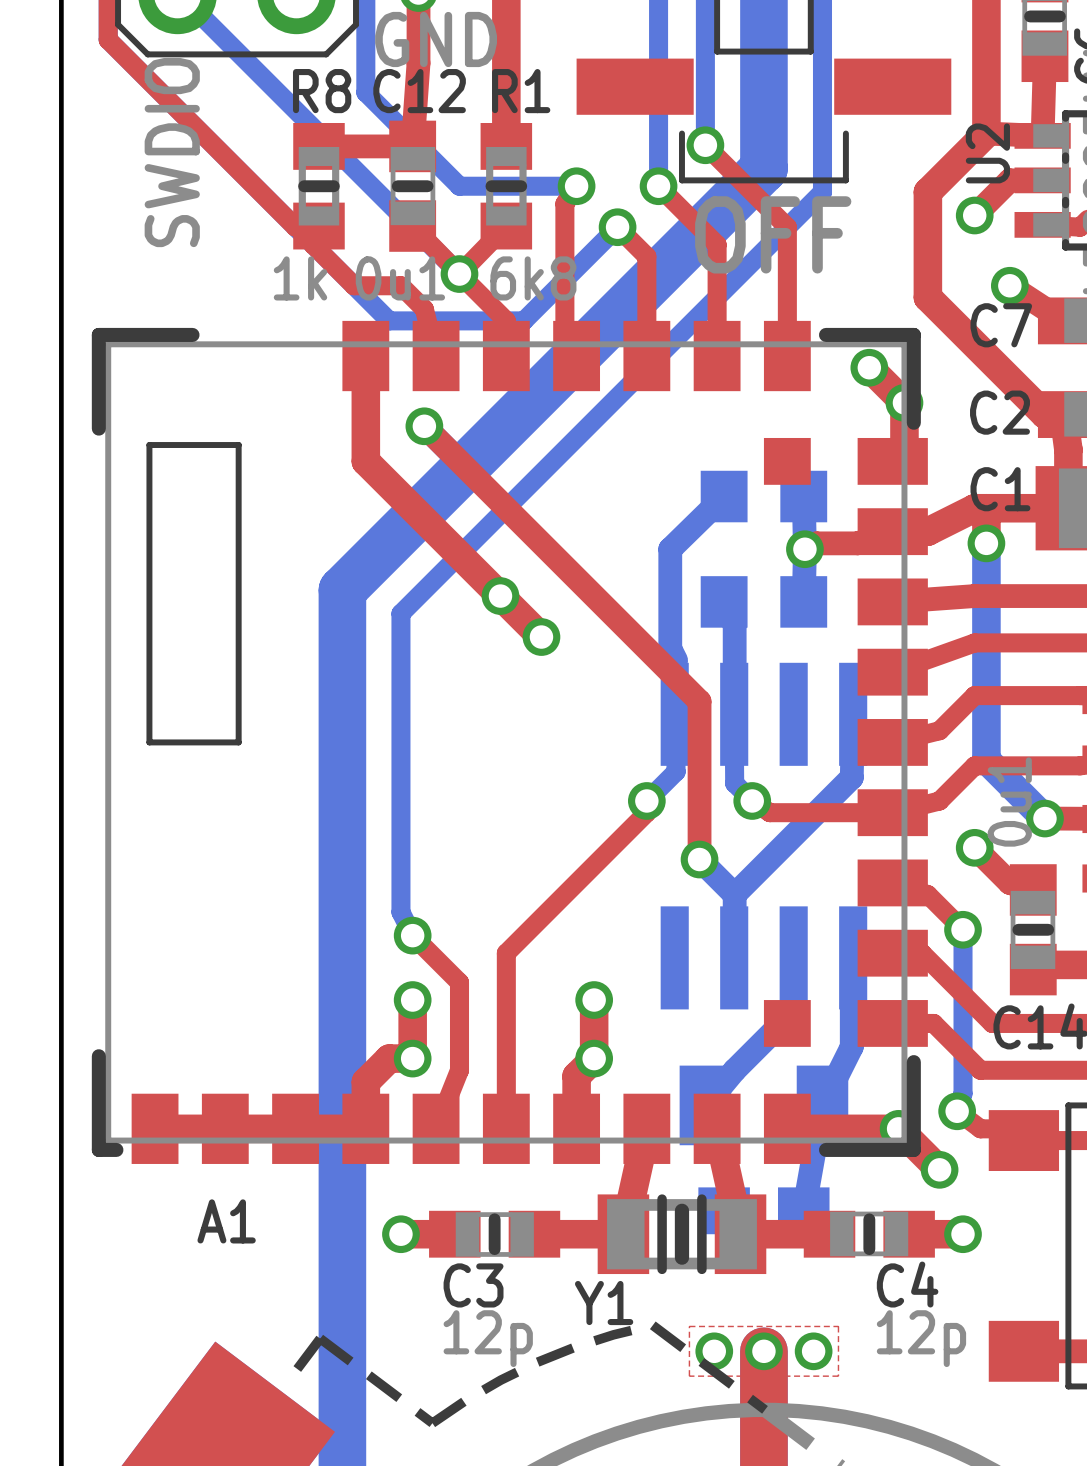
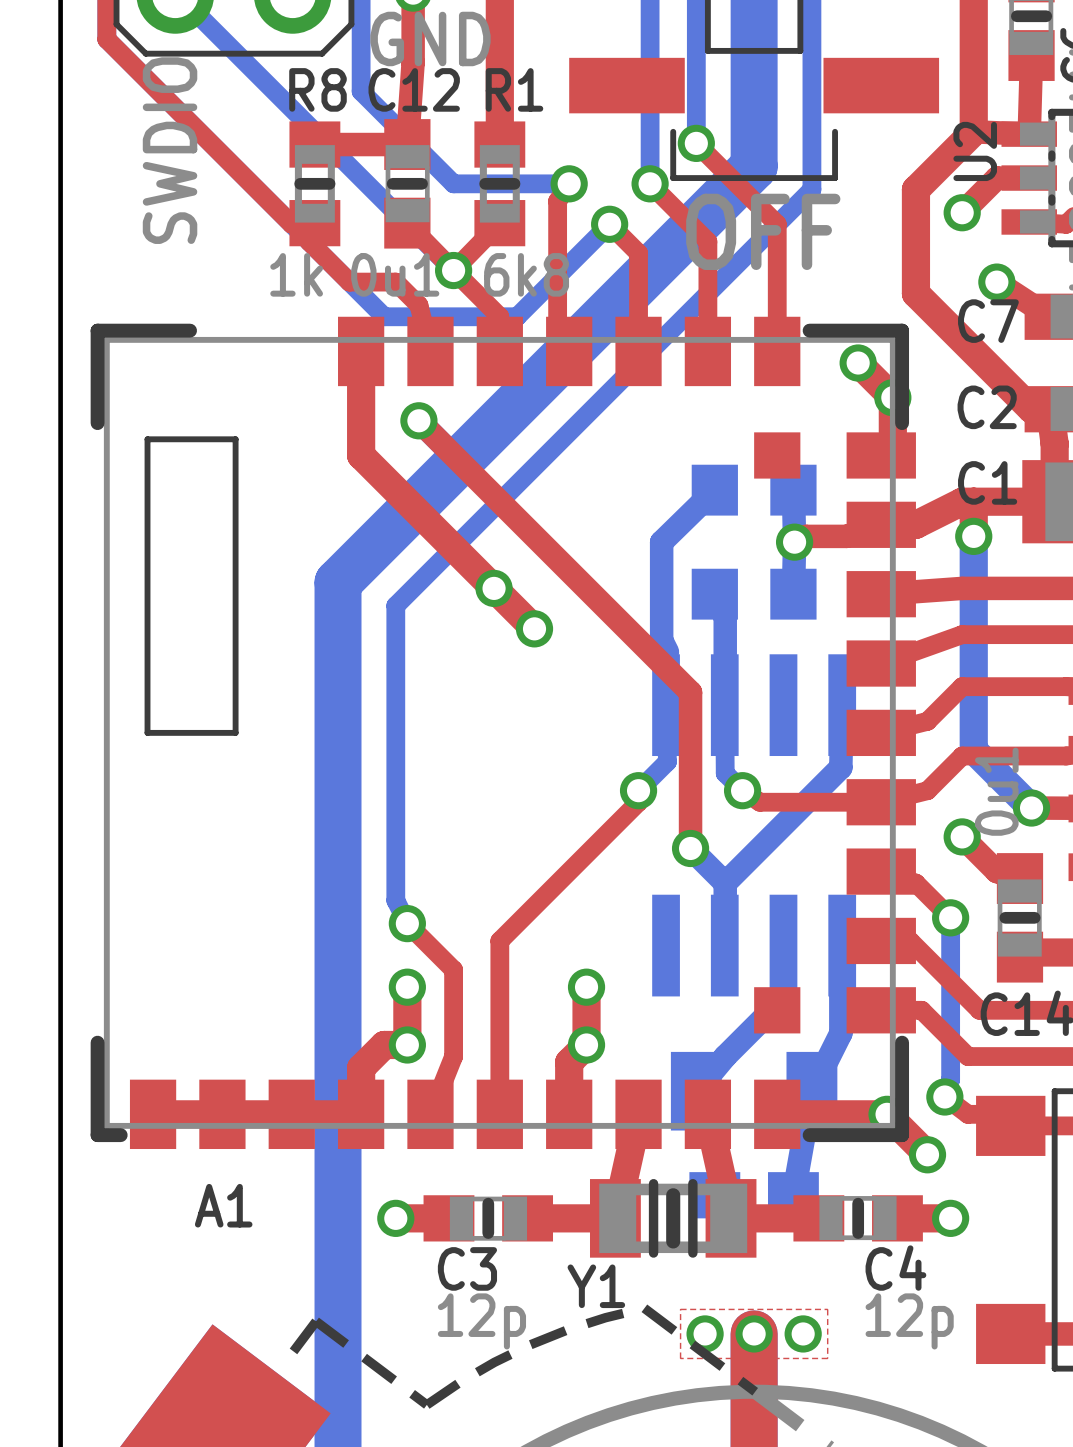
A1 footprint: [91, 320, 928, 1164] -> [90, 316, 916, 1150]

